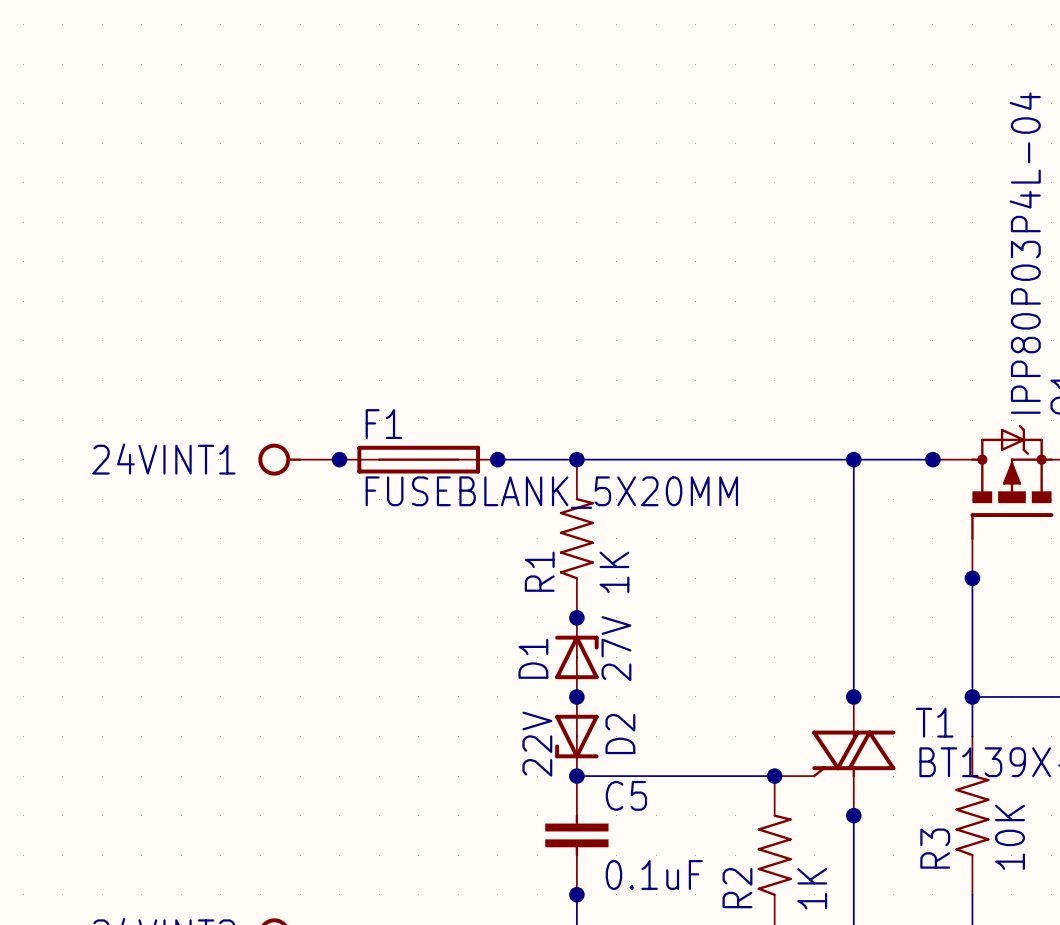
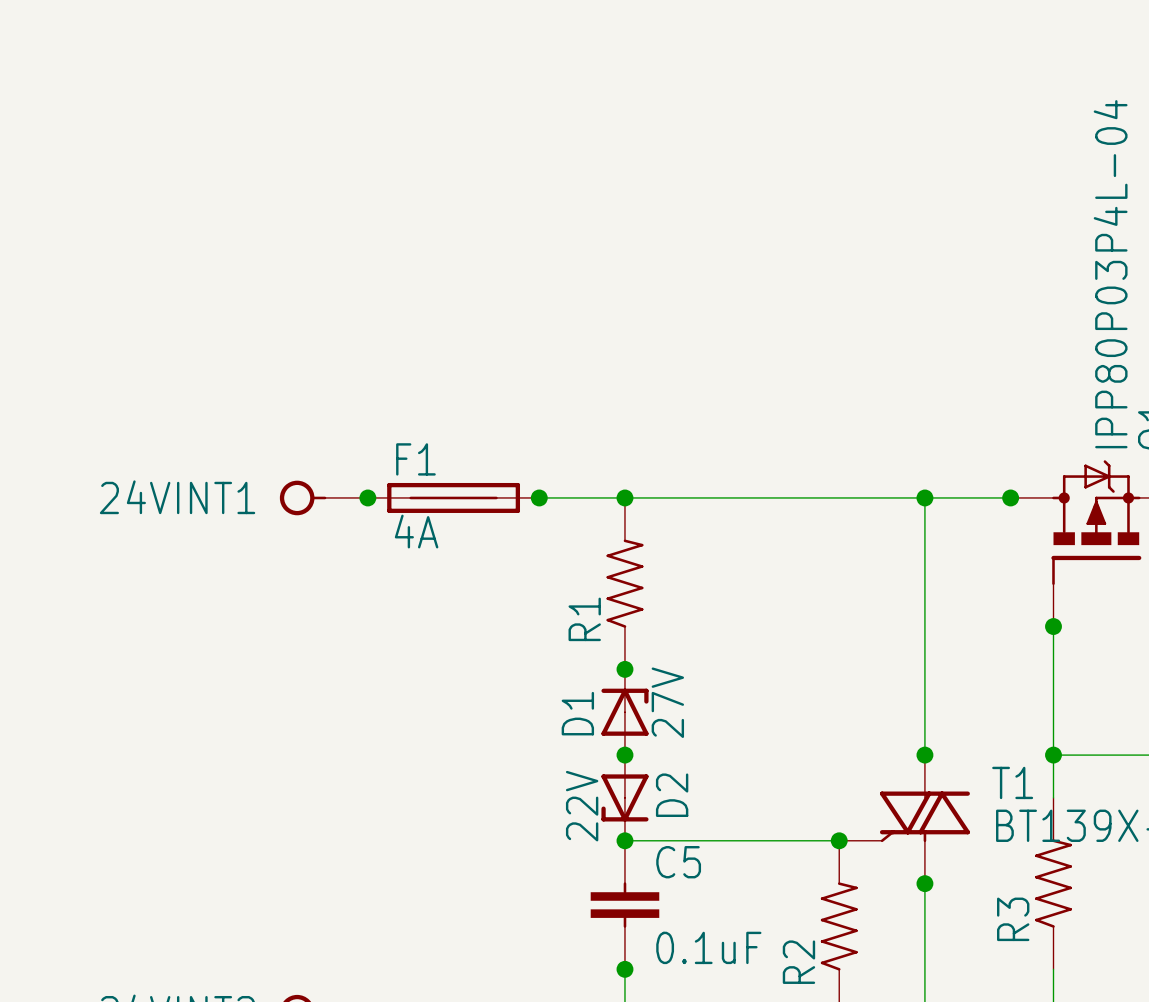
F1 value: FUSEBLANK_5X20MM (551, 492) -> 4A (416, 531)
R1 value: 1K (614, 572) -> none
R3 value: 10K (1010, 837) -> none
R2 value: 1K (812, 888) -> none

